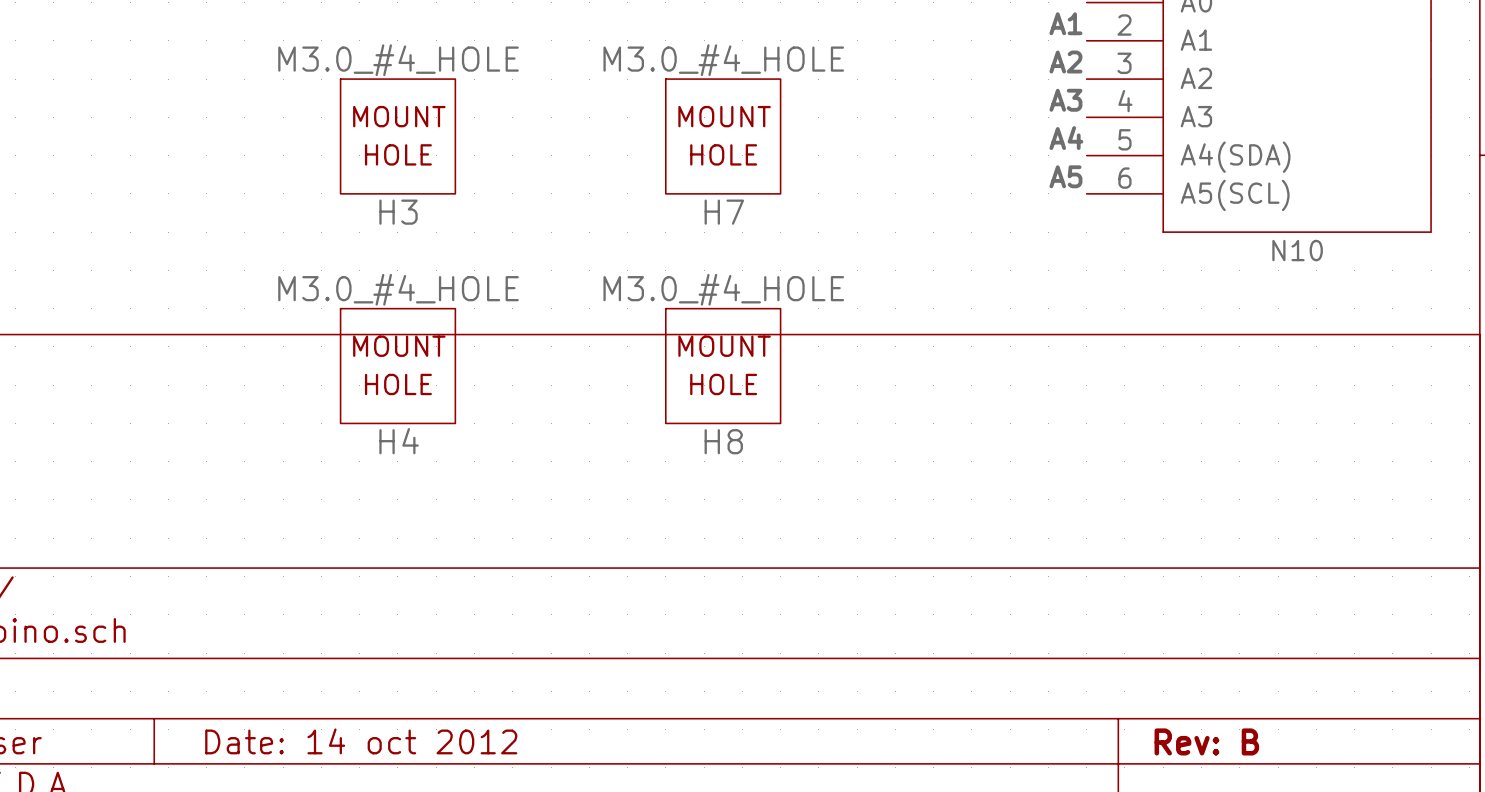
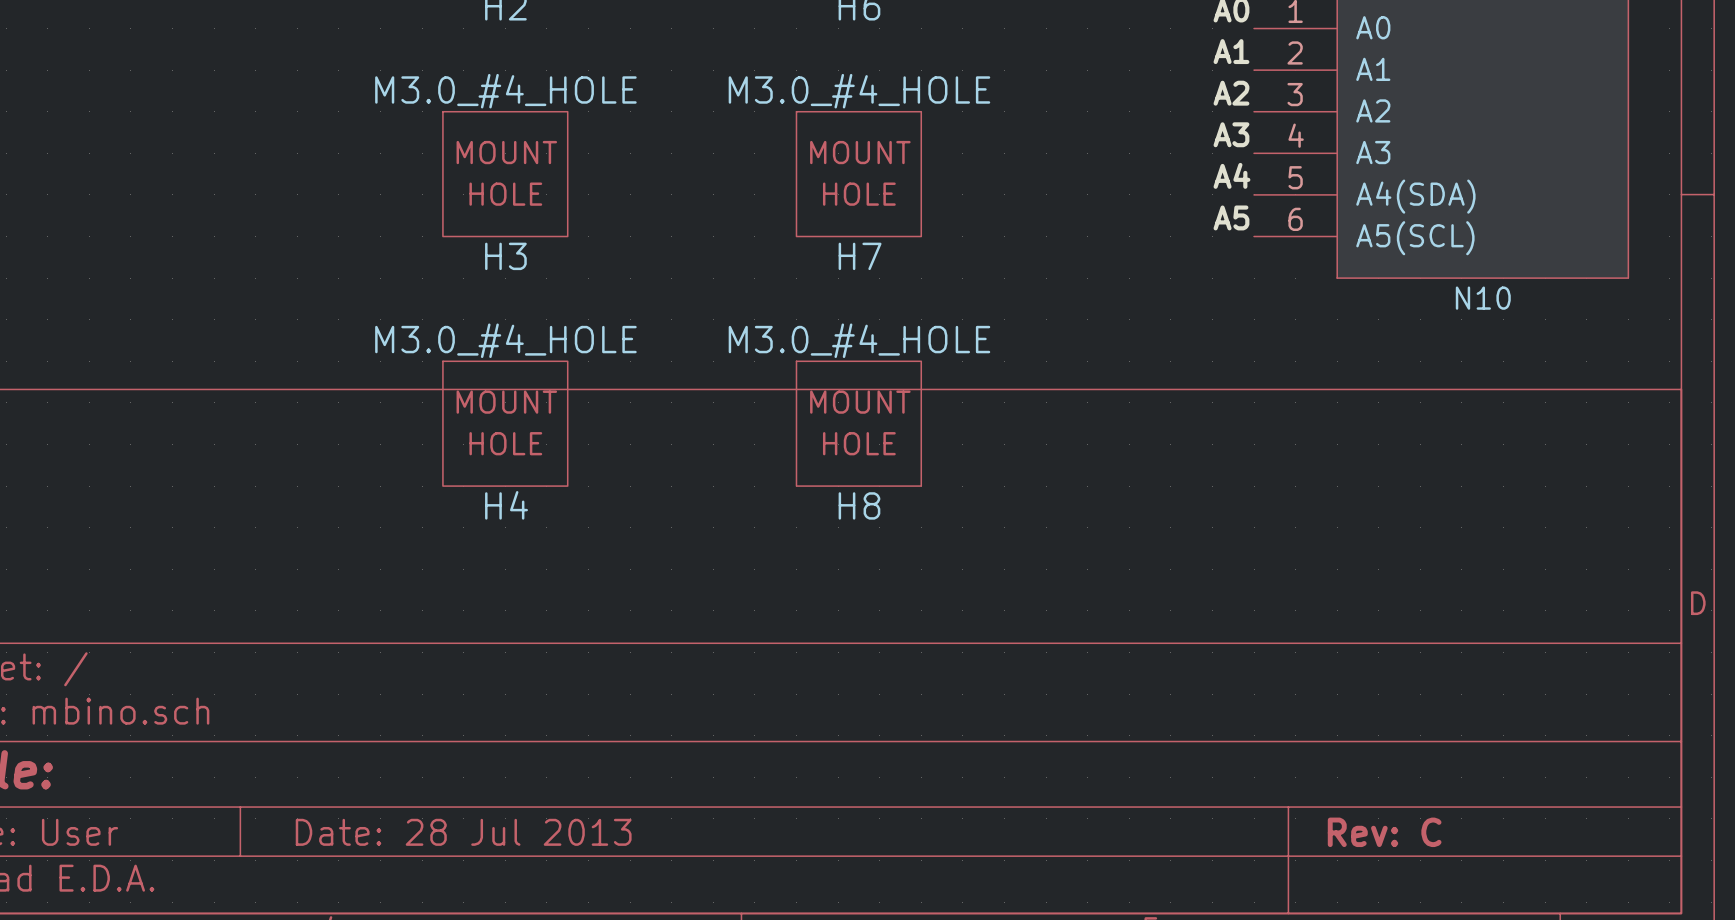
title block: Date: 14 oct 2012 (361, 741) -> Date: 28 Jul 2013 (463, 832)
title block: Rev: B (1206, 741) -> Rev: C (1384, 832)

